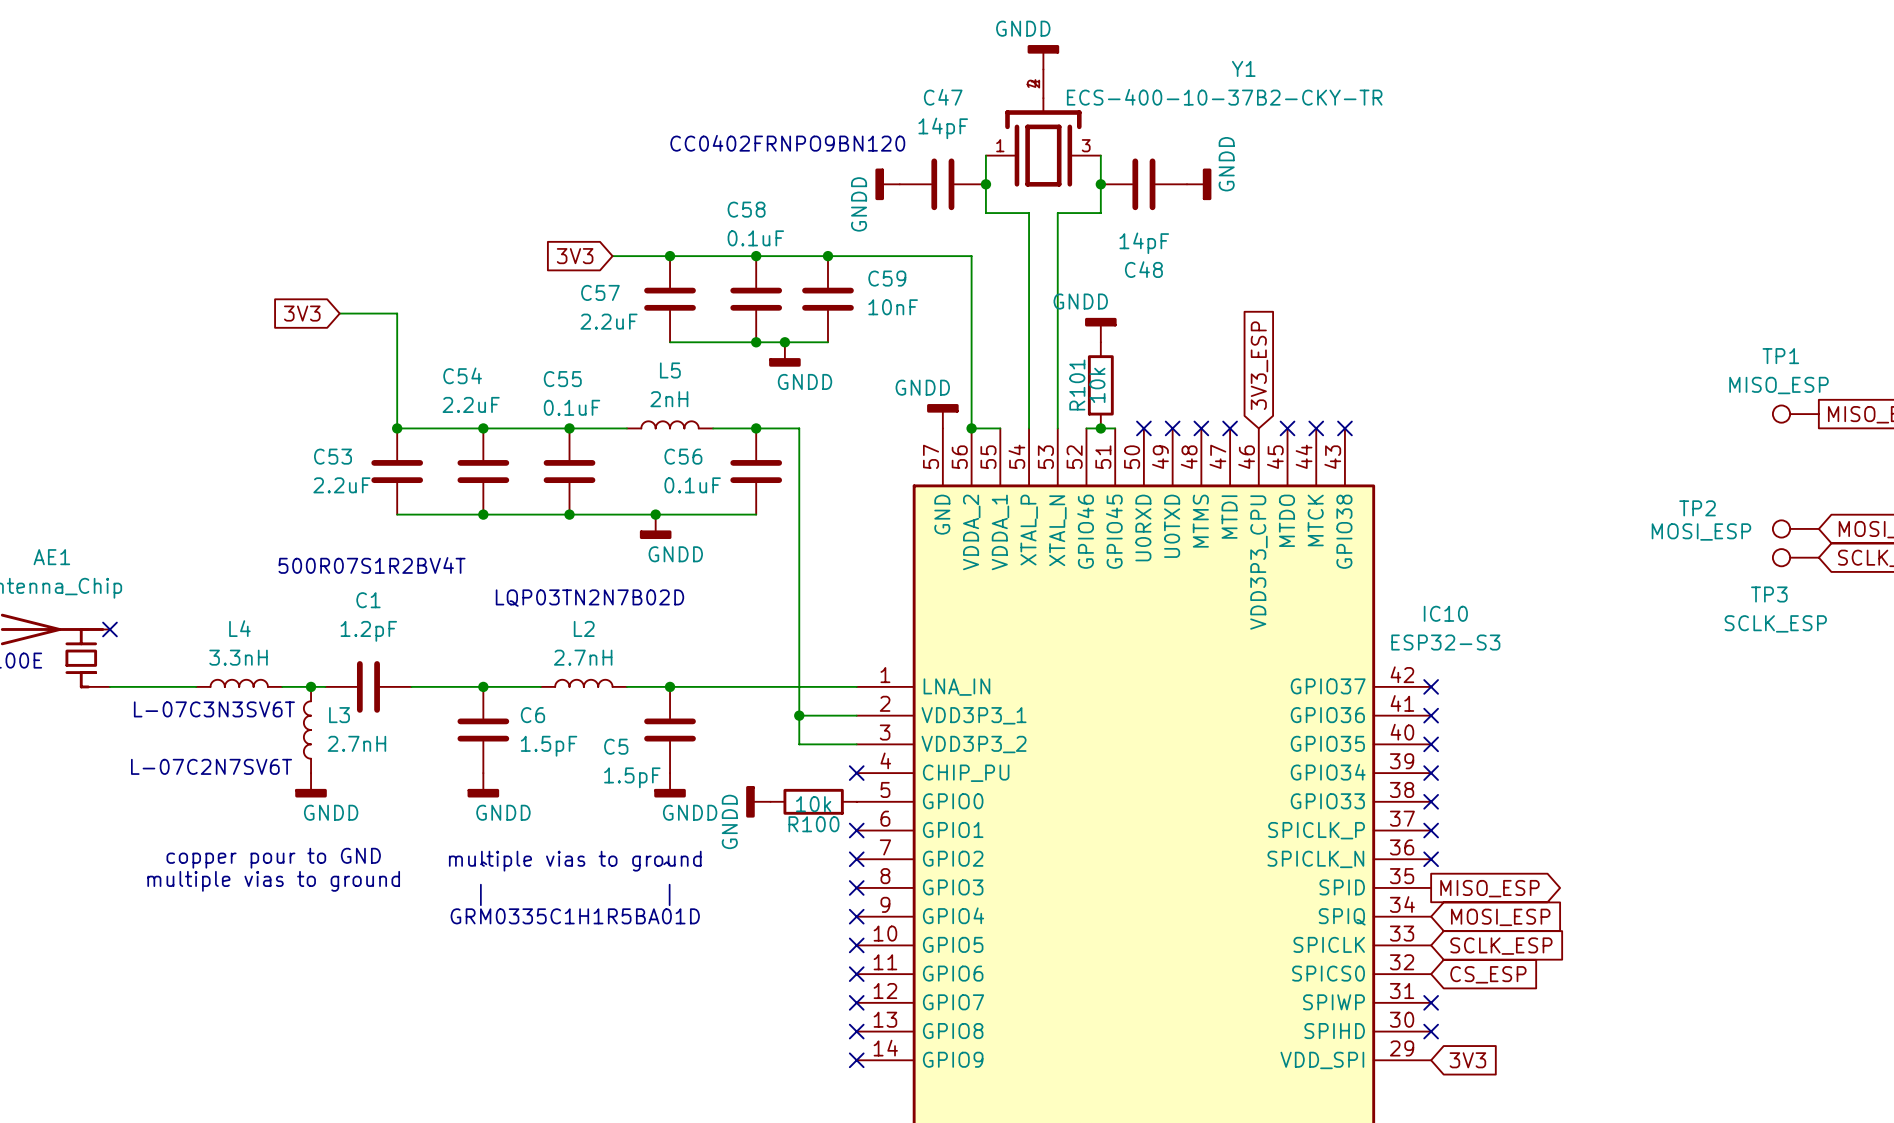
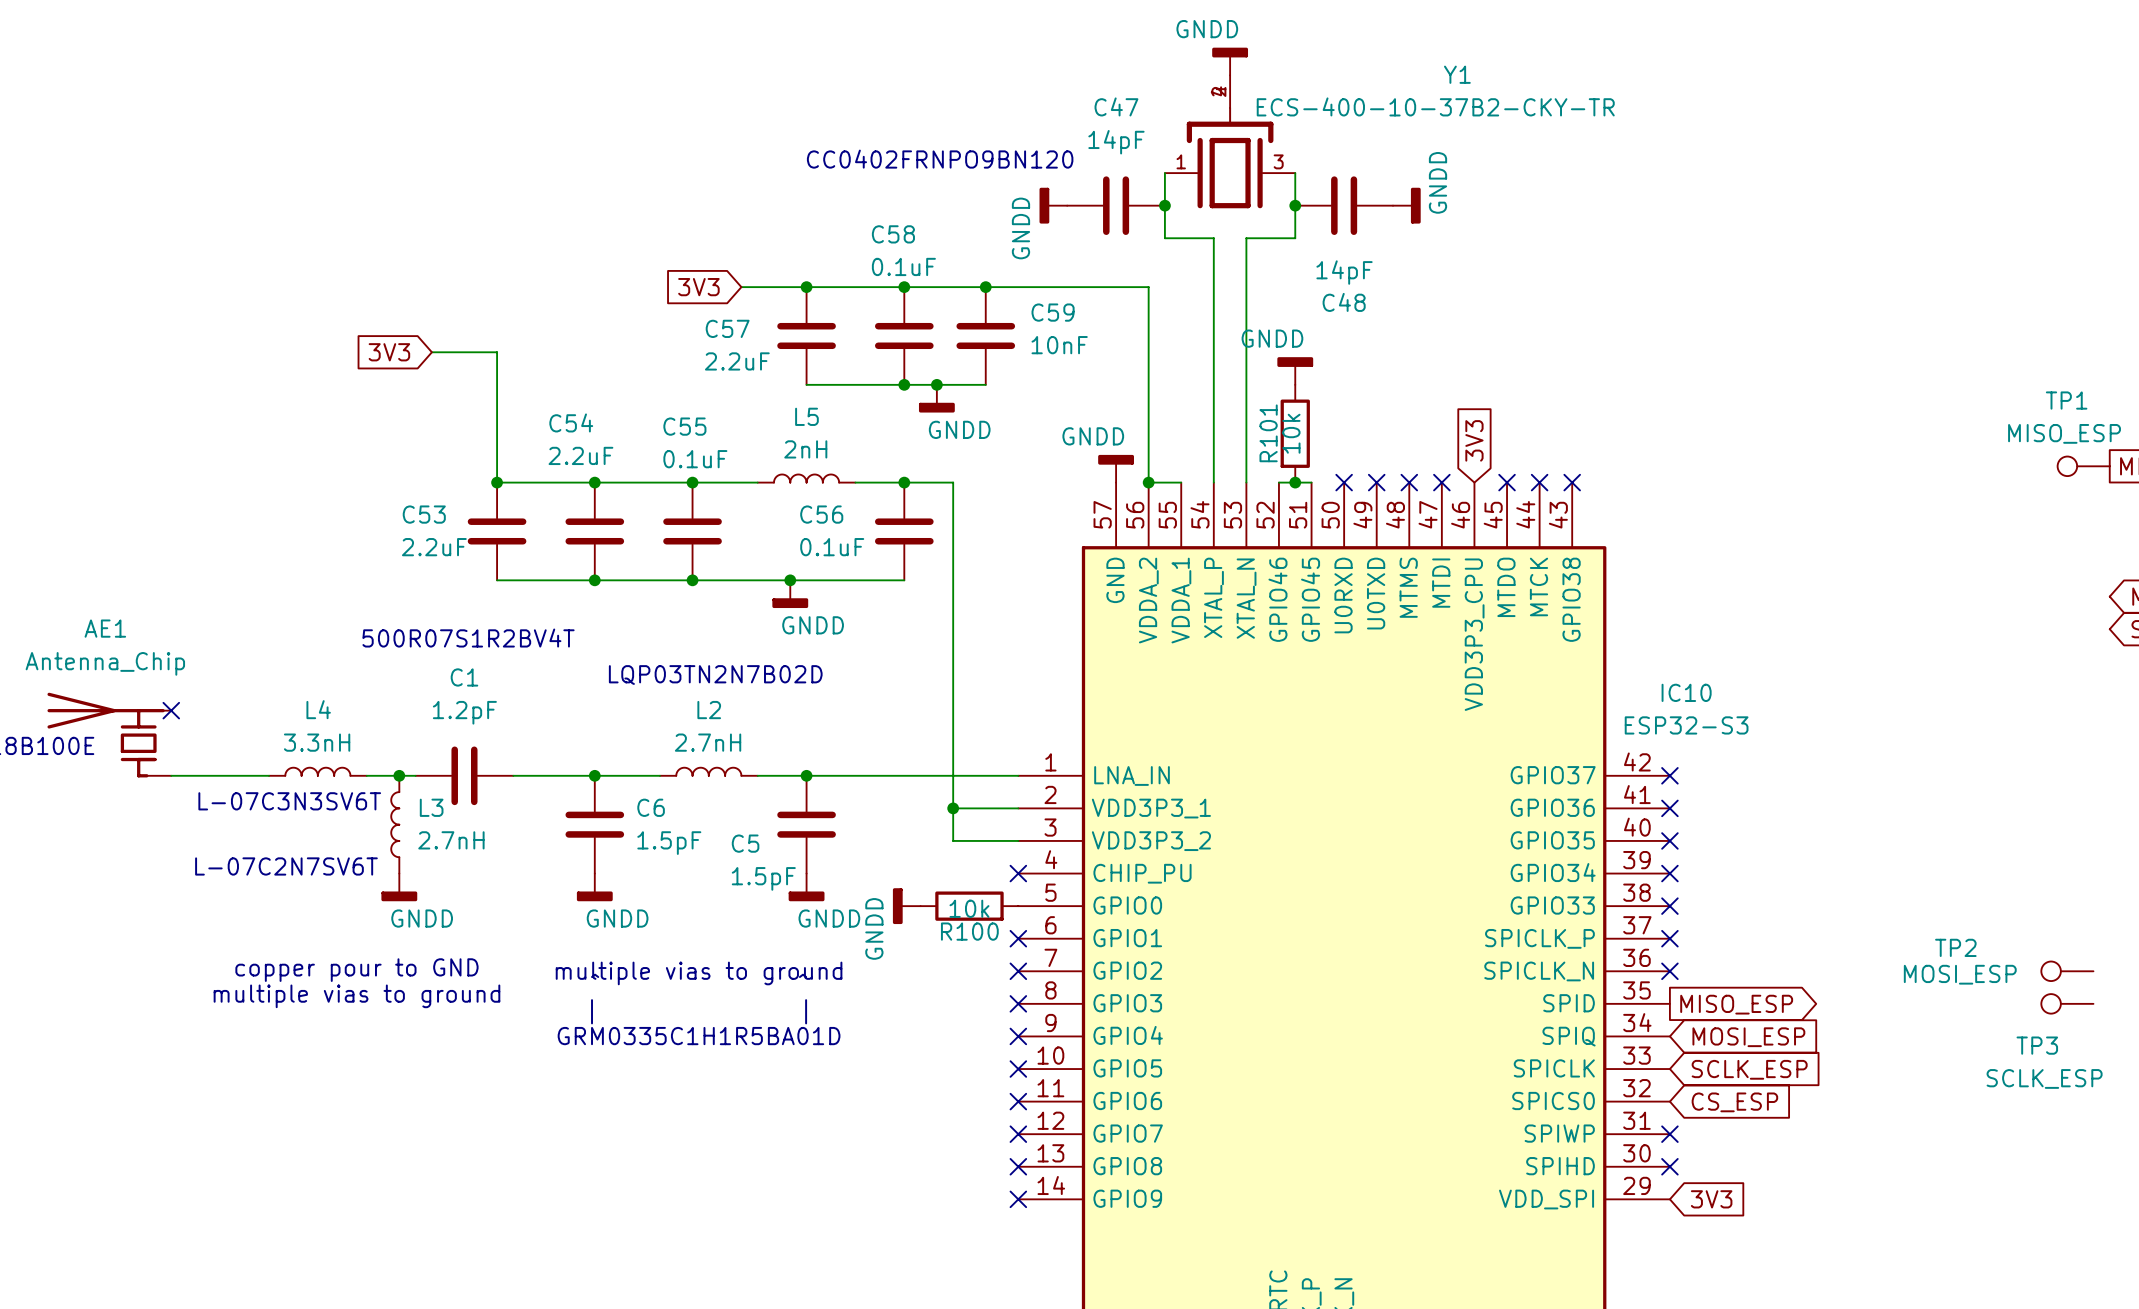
global label: 3V3_ESP (1259, 365) -> 3V3 (1474, 440)
TP2 position: (1795, 528) -> (2067, 971)
TP3 position: (1795, 557) -> (2067, 1003)

